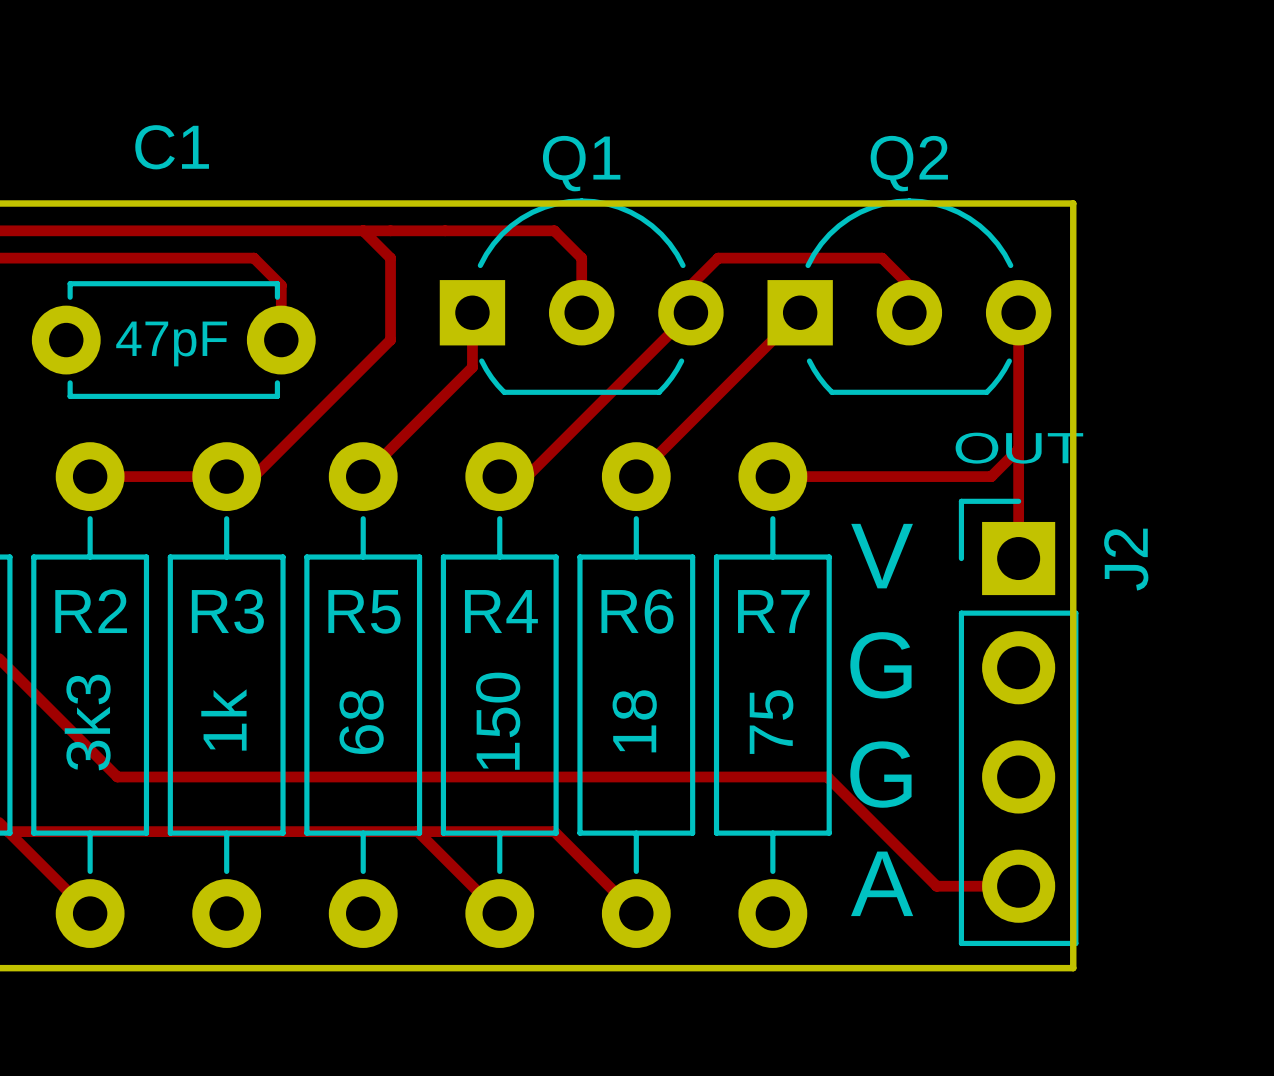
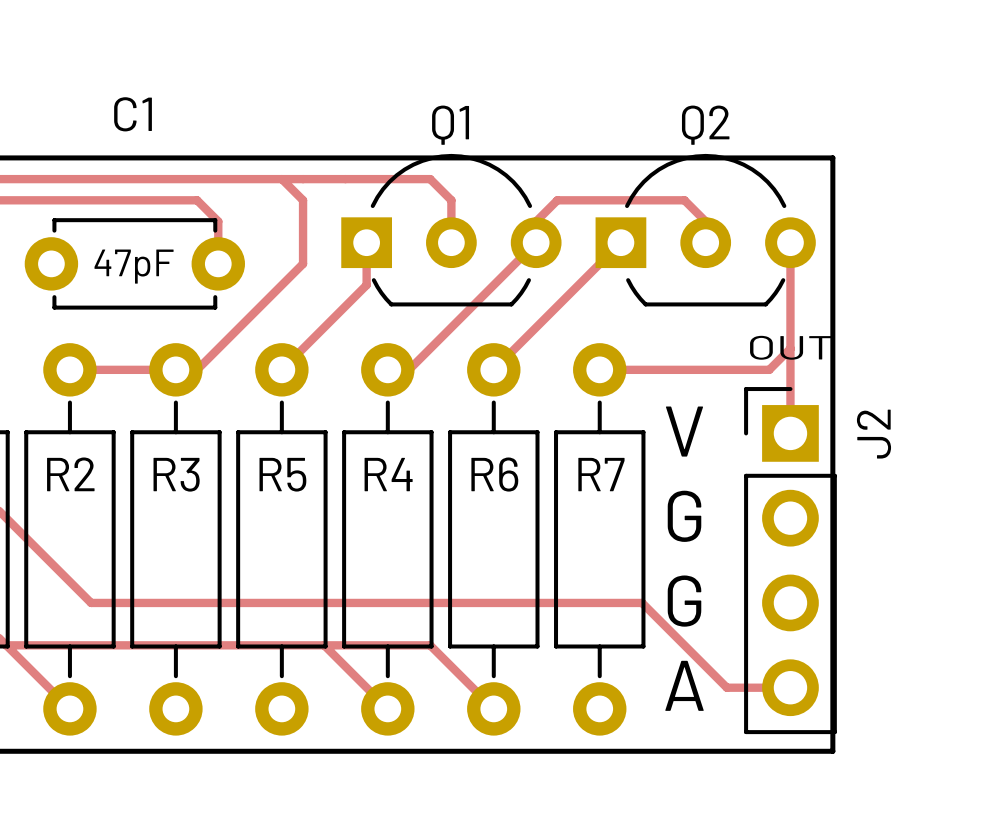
R3 value: 1k (223, 719) -> none
R4 value: 150 (498, 721) -> none
R6 value: 18 (634, 721) -> none
R2 value: 3k3 (87, 722) -> none
R5 value: 68 (361, 722) -> none
R7 value: 75 (771, 722) -> none

